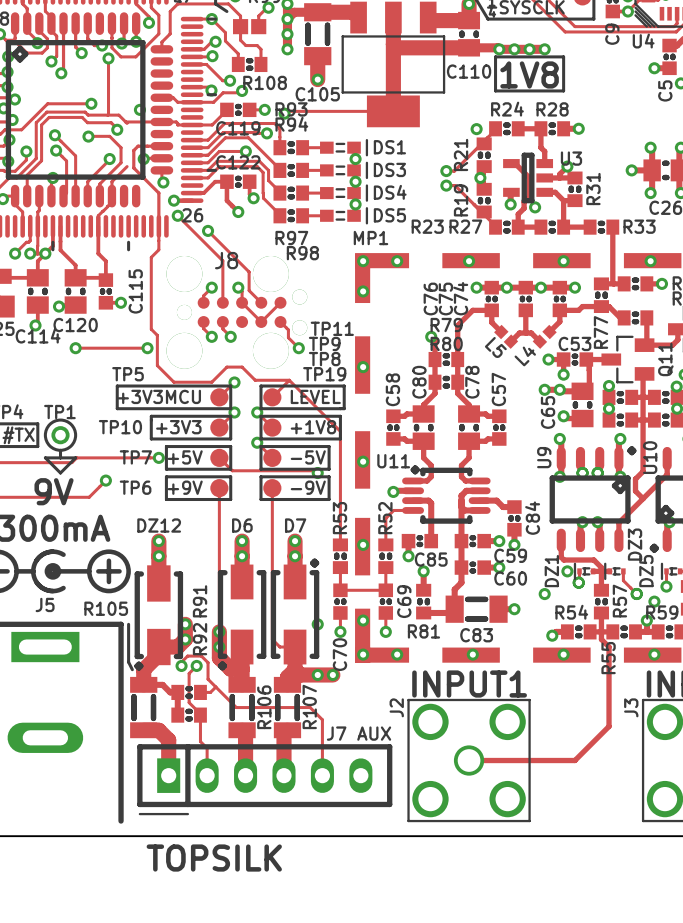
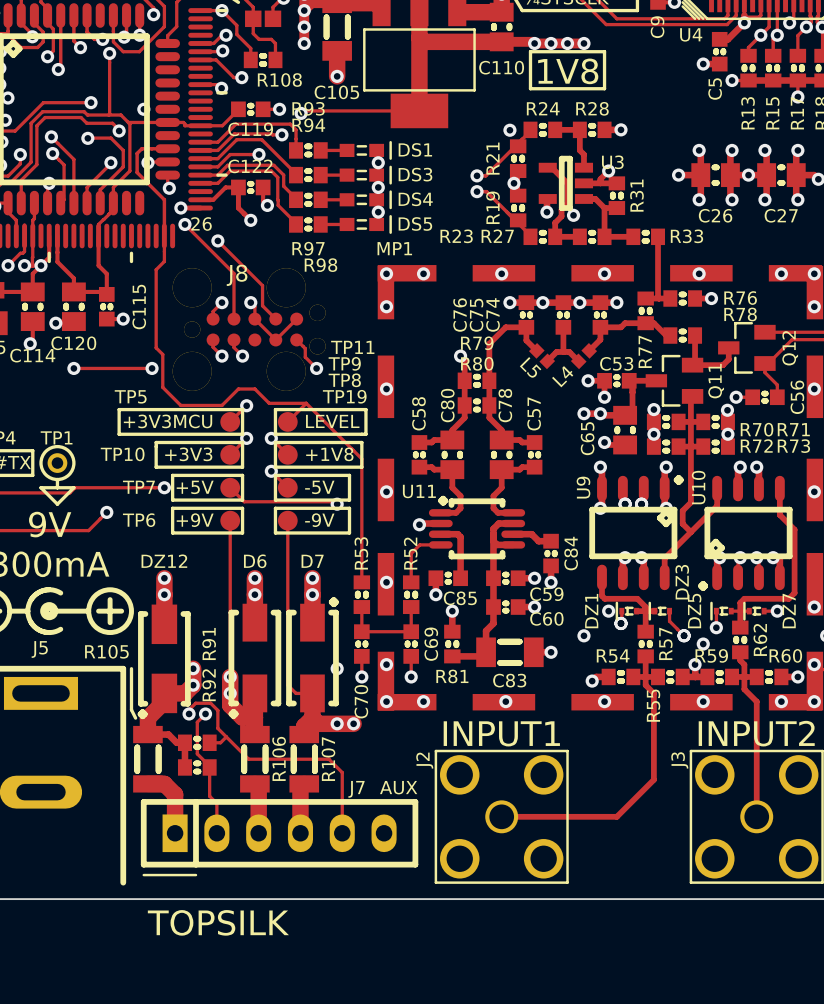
track: (242, 90) (240, 92) (223, 92) (213, 102) (177, 102) (173, 97) (161, 97) -> none
via: (242, 90) -> none
track: none -> (129, 123) (129, 170)

